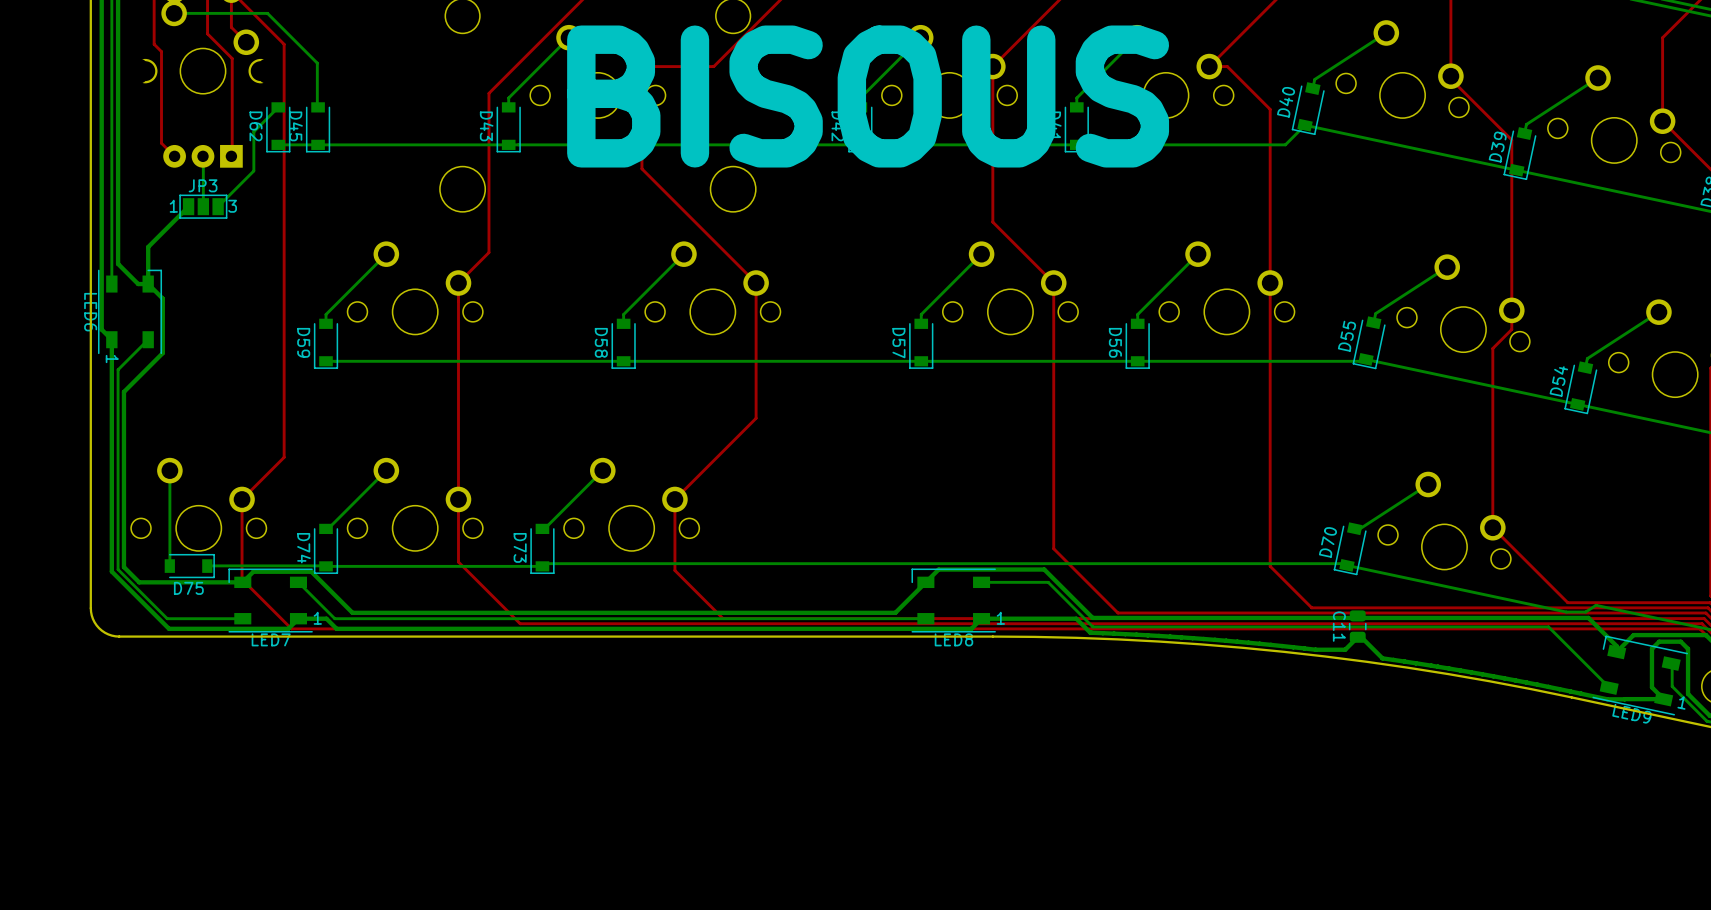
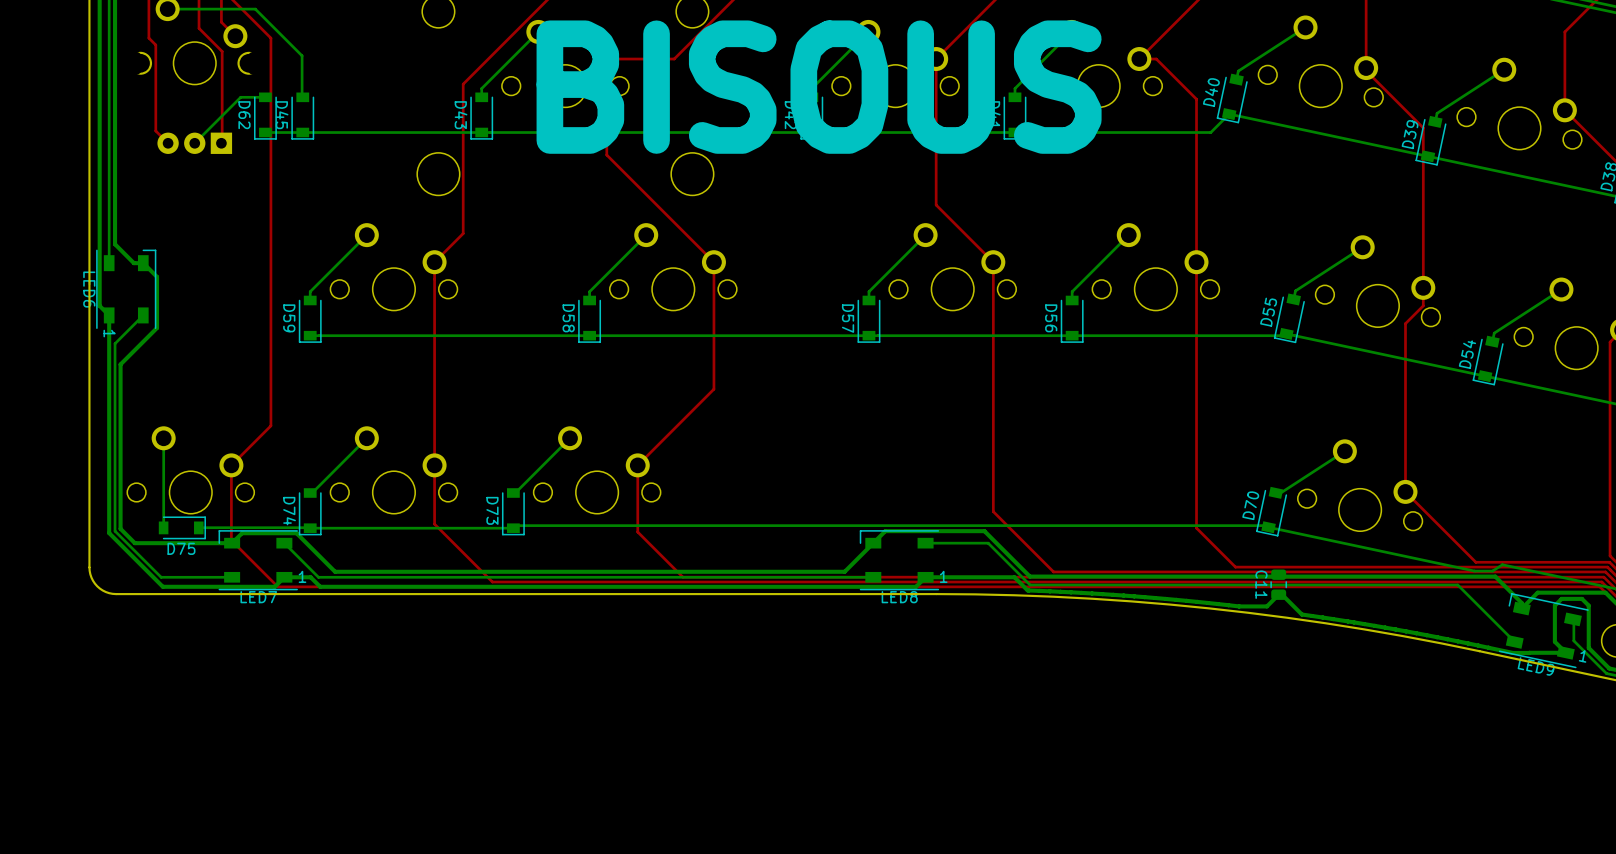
bottom track: (278, 107) (253, 131) (253, 170) (218, 206) -> (265, 97) (240, 97) (194, 143)
bottom track: (203, 156) (203, 206) -> none
bottom track: (188, 206) (148, 247) (148, 284) -> none
JP3: (203, 206) -> none

